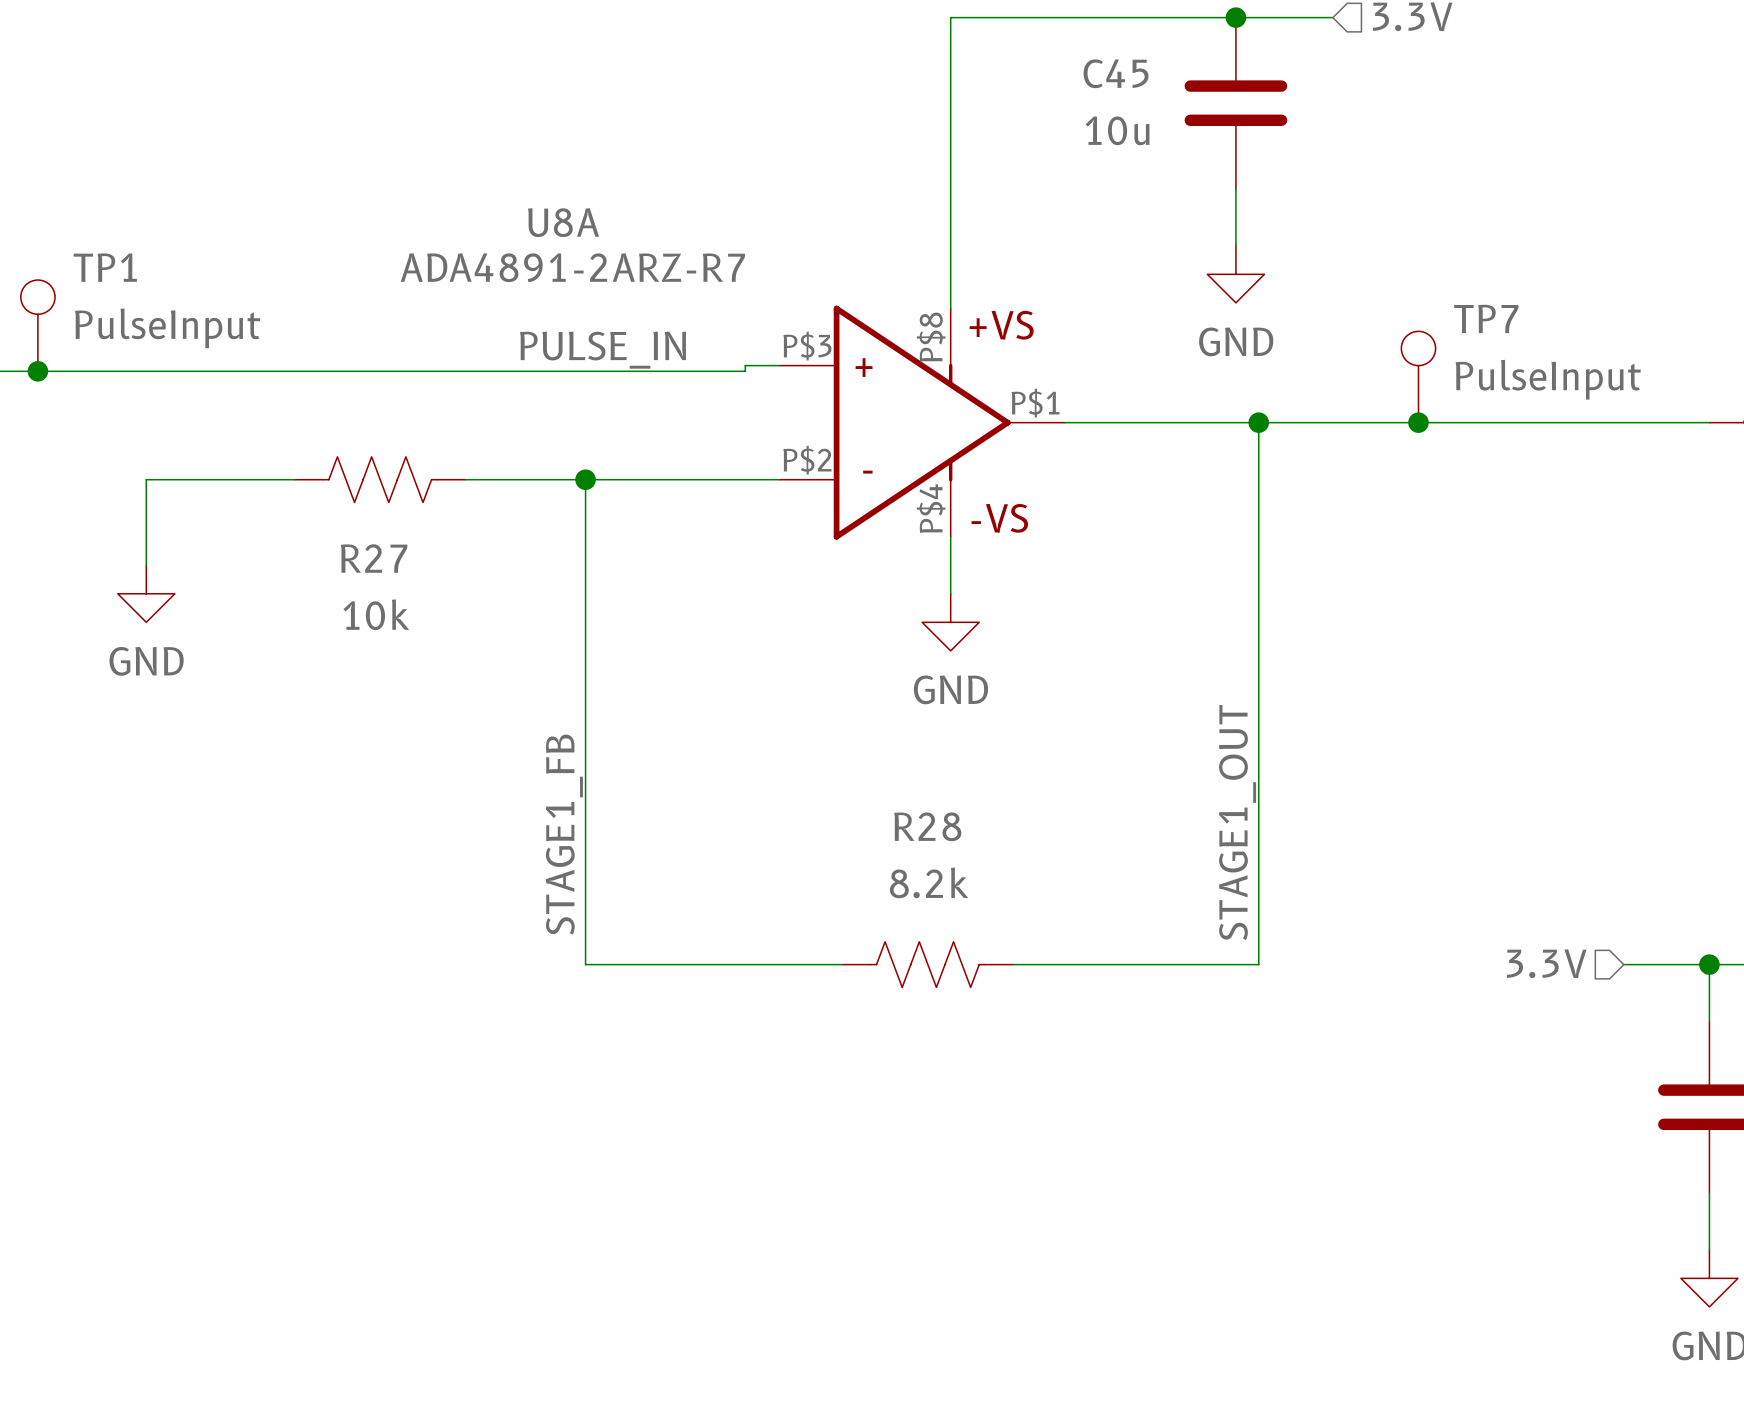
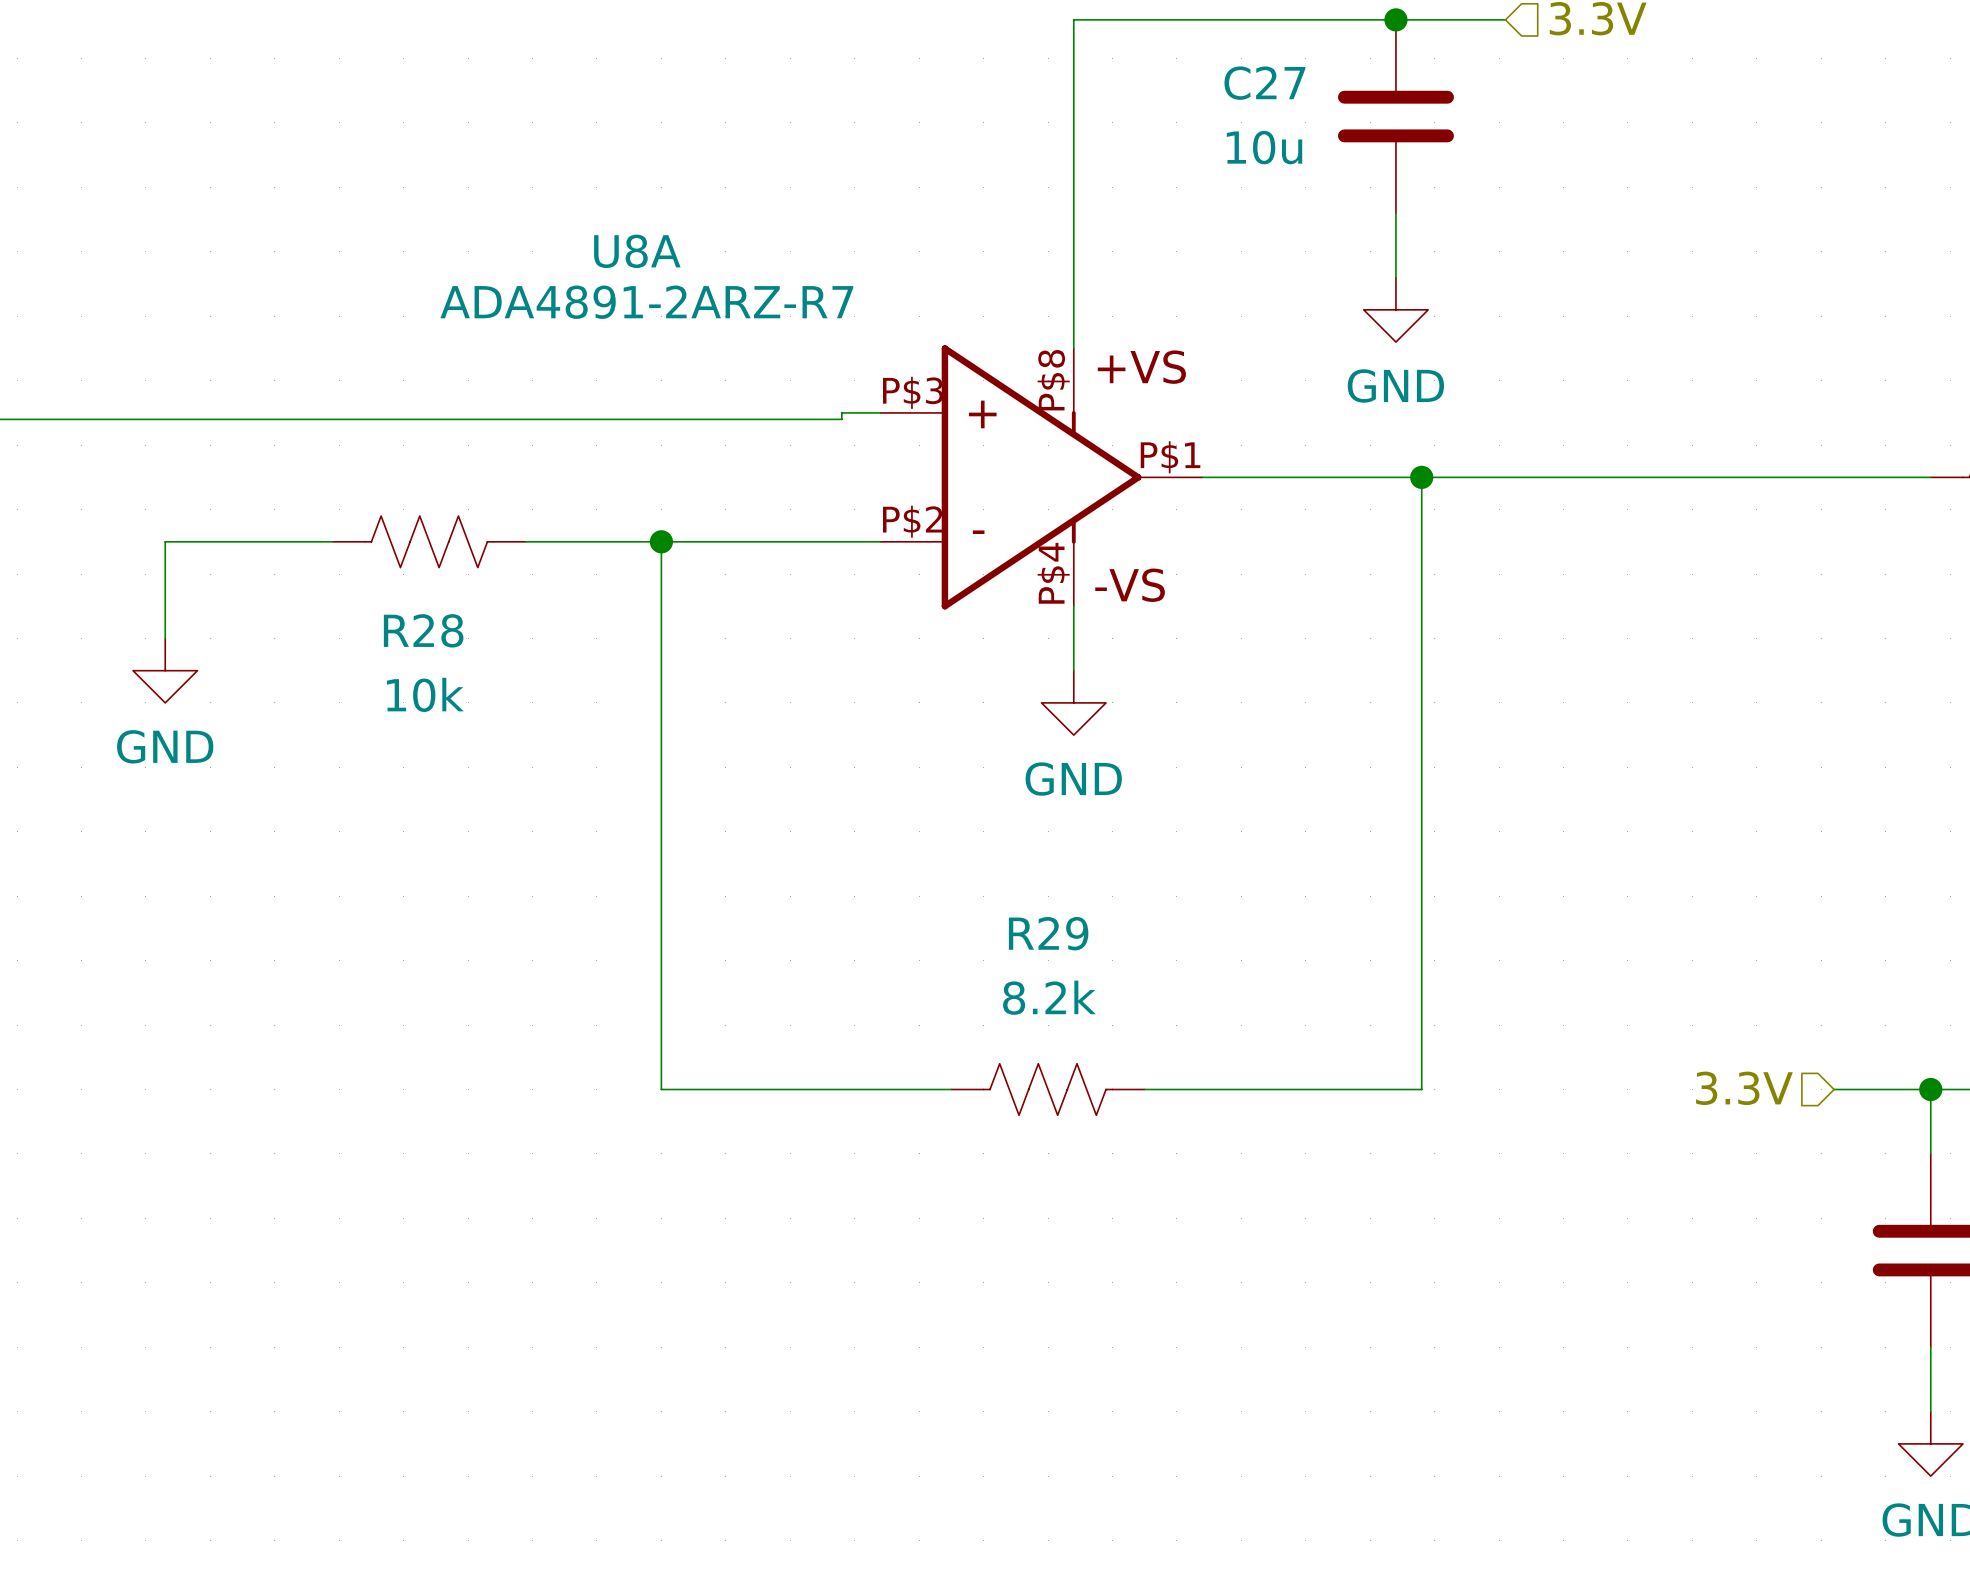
C45 name: C45 (1116, 73) -> C27 (1264, 83)
TP1: PulseInput (37, 325) -> none
label: PULSE_IN (602, 350) -> none
junction: (37, 371) -> none
TP7: PulseInput (1418, 377) -> none
junction: (1418, 422) -> none
R27 name: R27 (374, 558) -> R28 (423, 630)
label: STAGE1_OUT (1237, 822) -> none
R28 name: R28 (927, 826) -> R29 (1048, 933)
label: STAGE1_FB (564, 834) -> none

